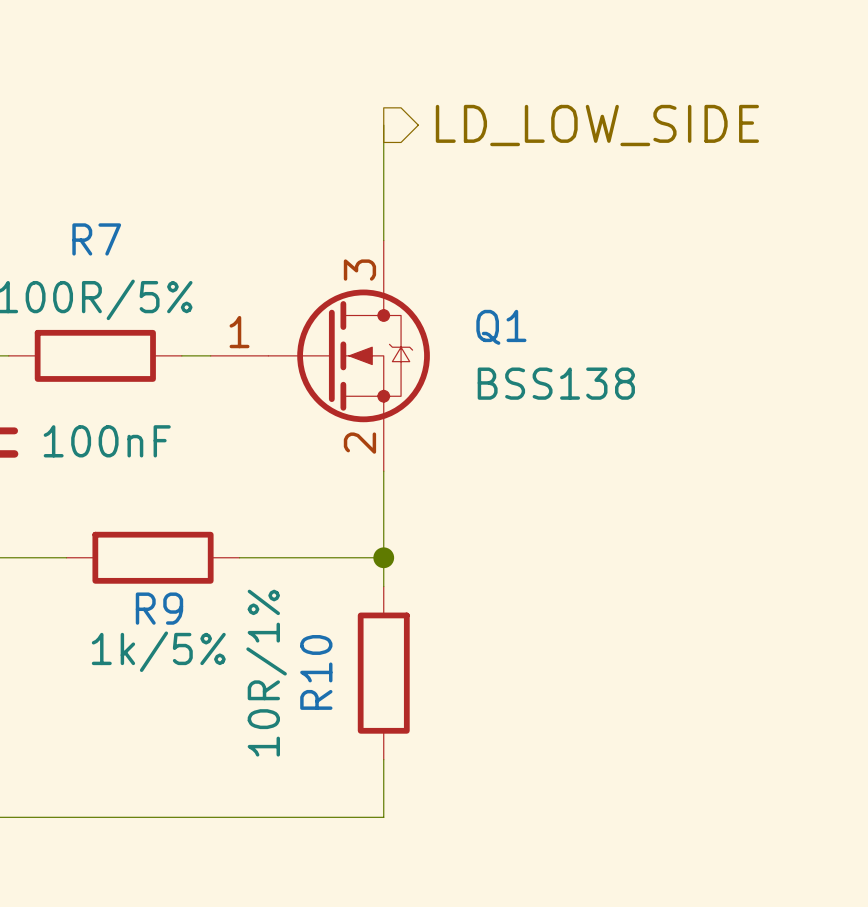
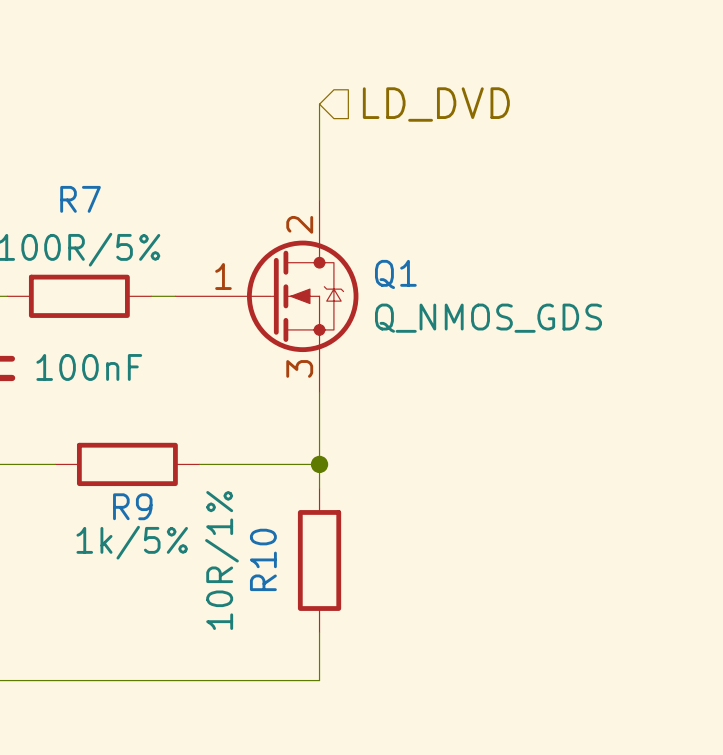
hierarchical label shape: output (597, 125) -> input (436, 104)
hierarchical label: LD_LOW_SIDE (597, 125) -> LD_DVD (436, 104)
Q1 symbol: [210, 240, 430, 472] -> [175, 200, 359, 393]
Q1 value: BSS138 (556, 383) -> Q_NMOS_GDS (488, 318)

